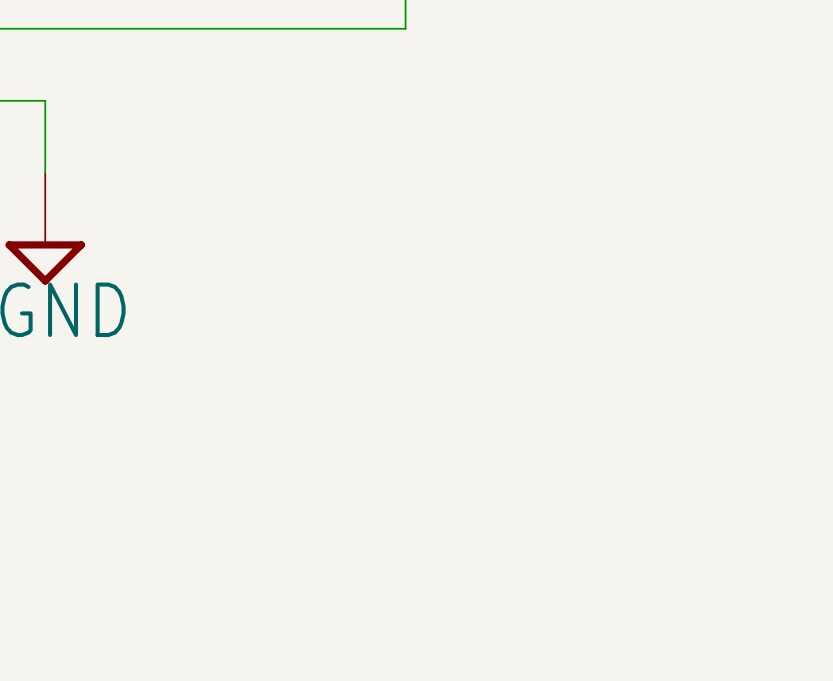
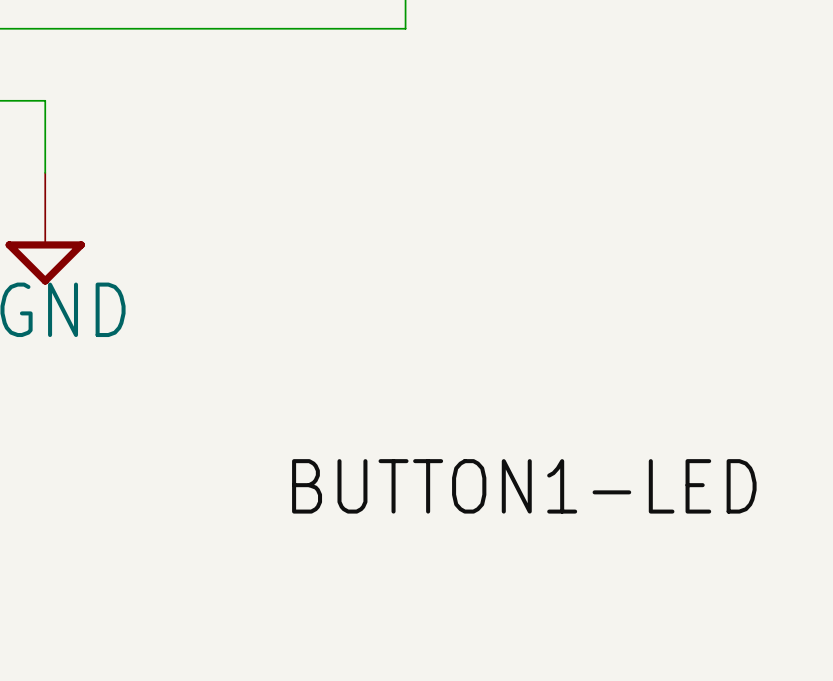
label: none -> BUTTON1-LED (524, 486)

